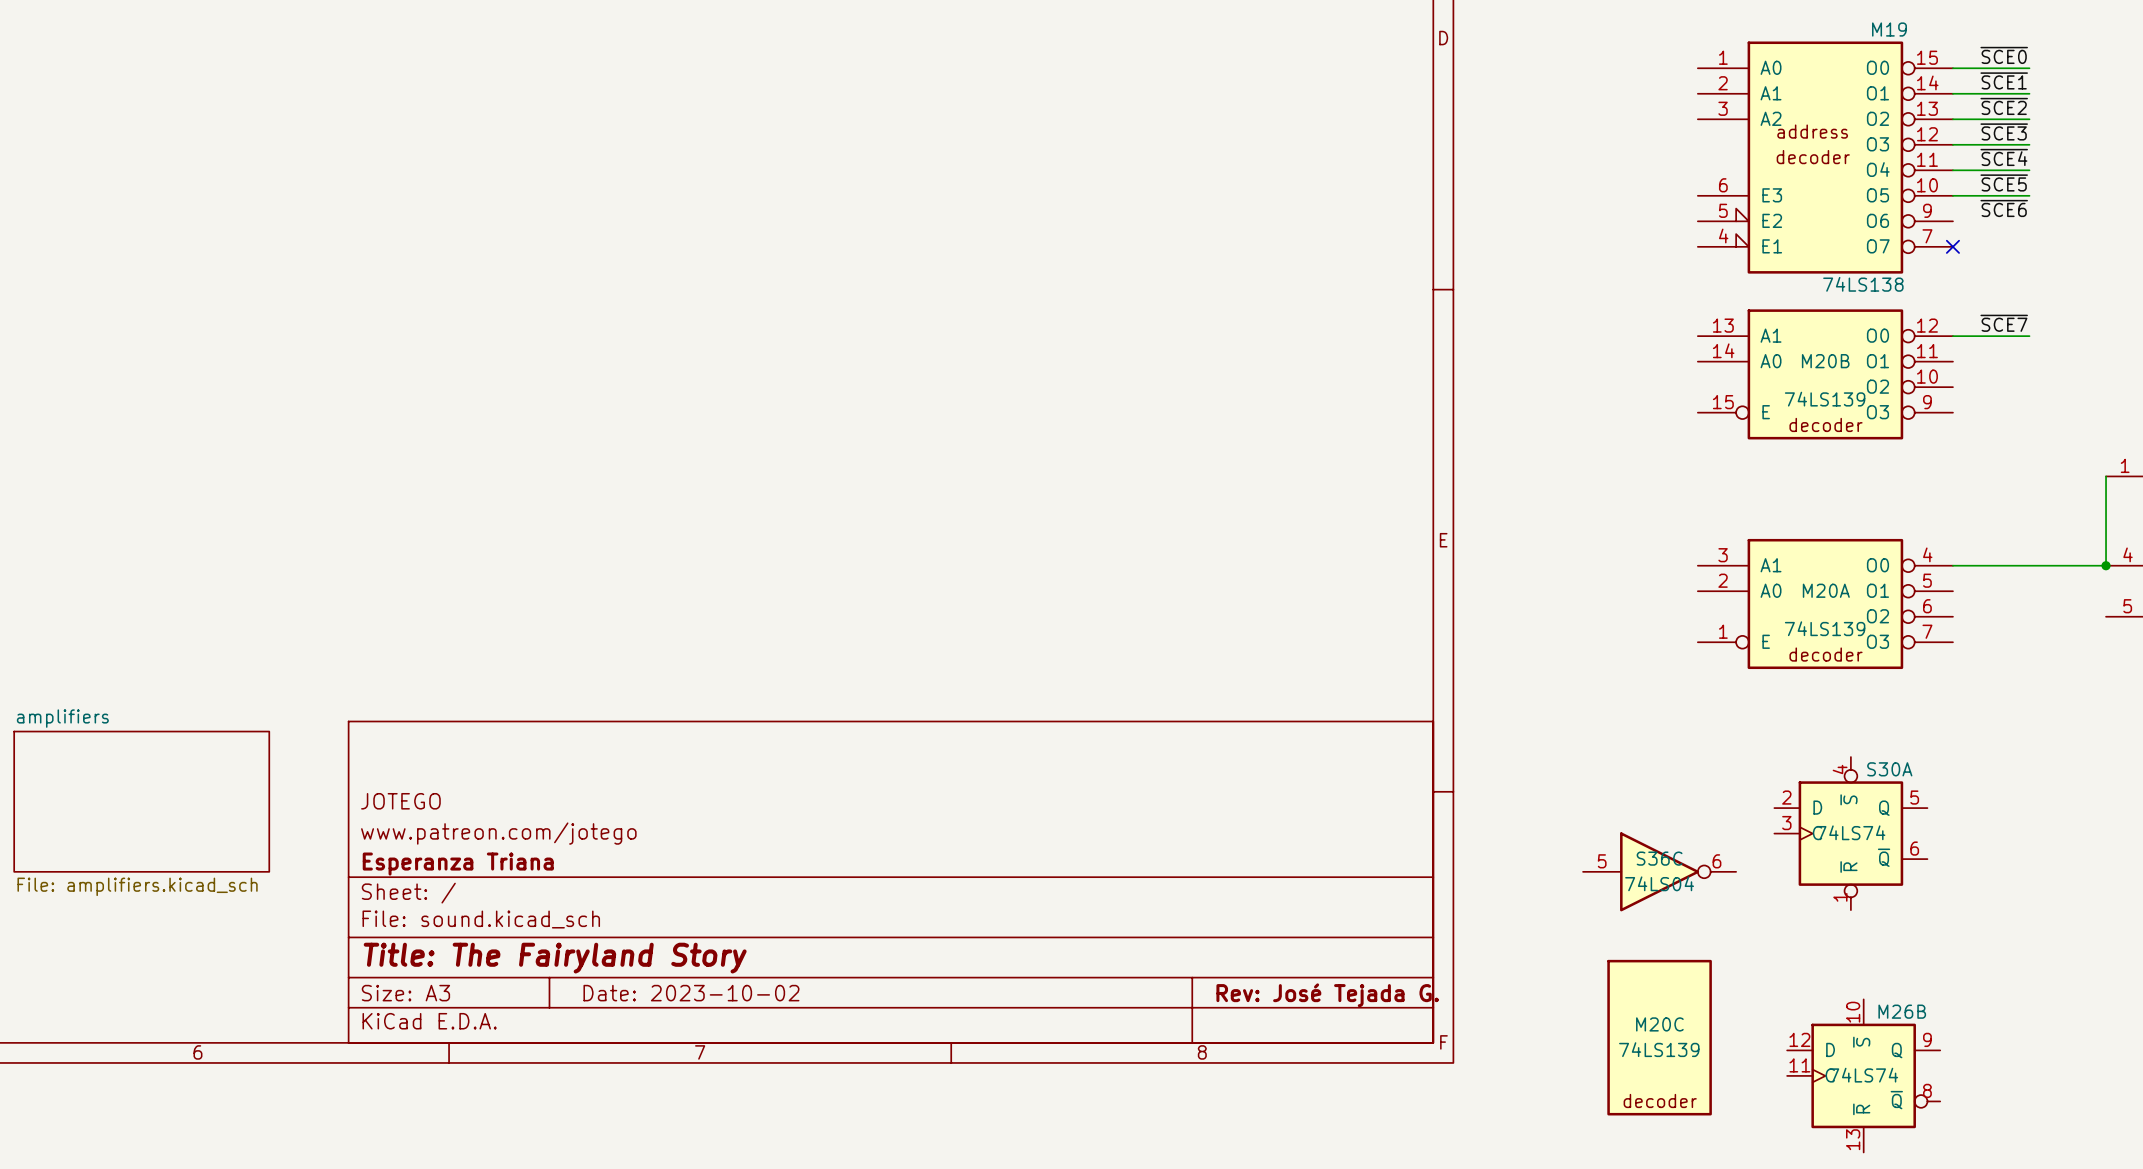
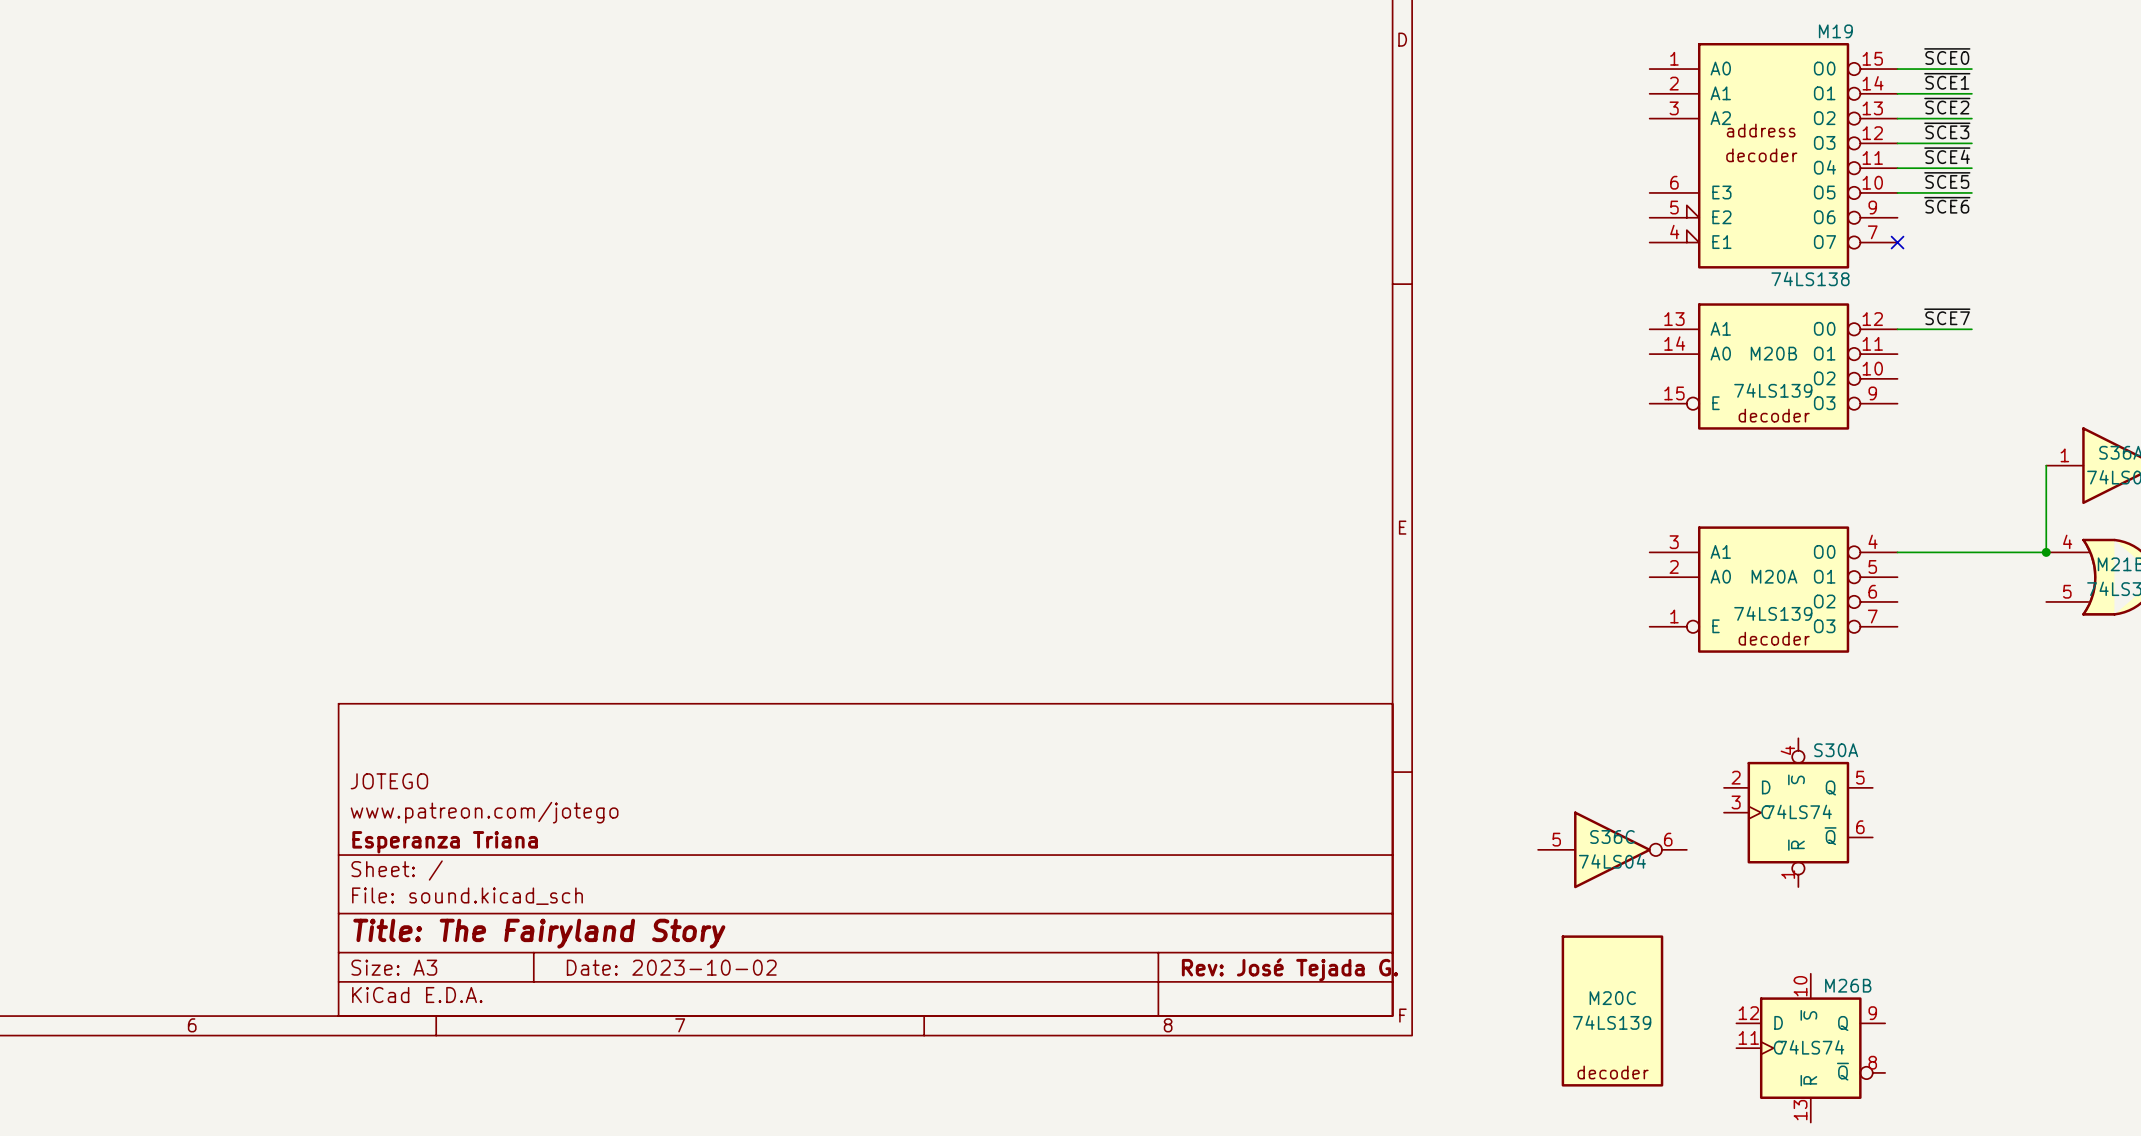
sheet amplifiers: File: amplifiers.kicad_sch (141, 801) -> none

